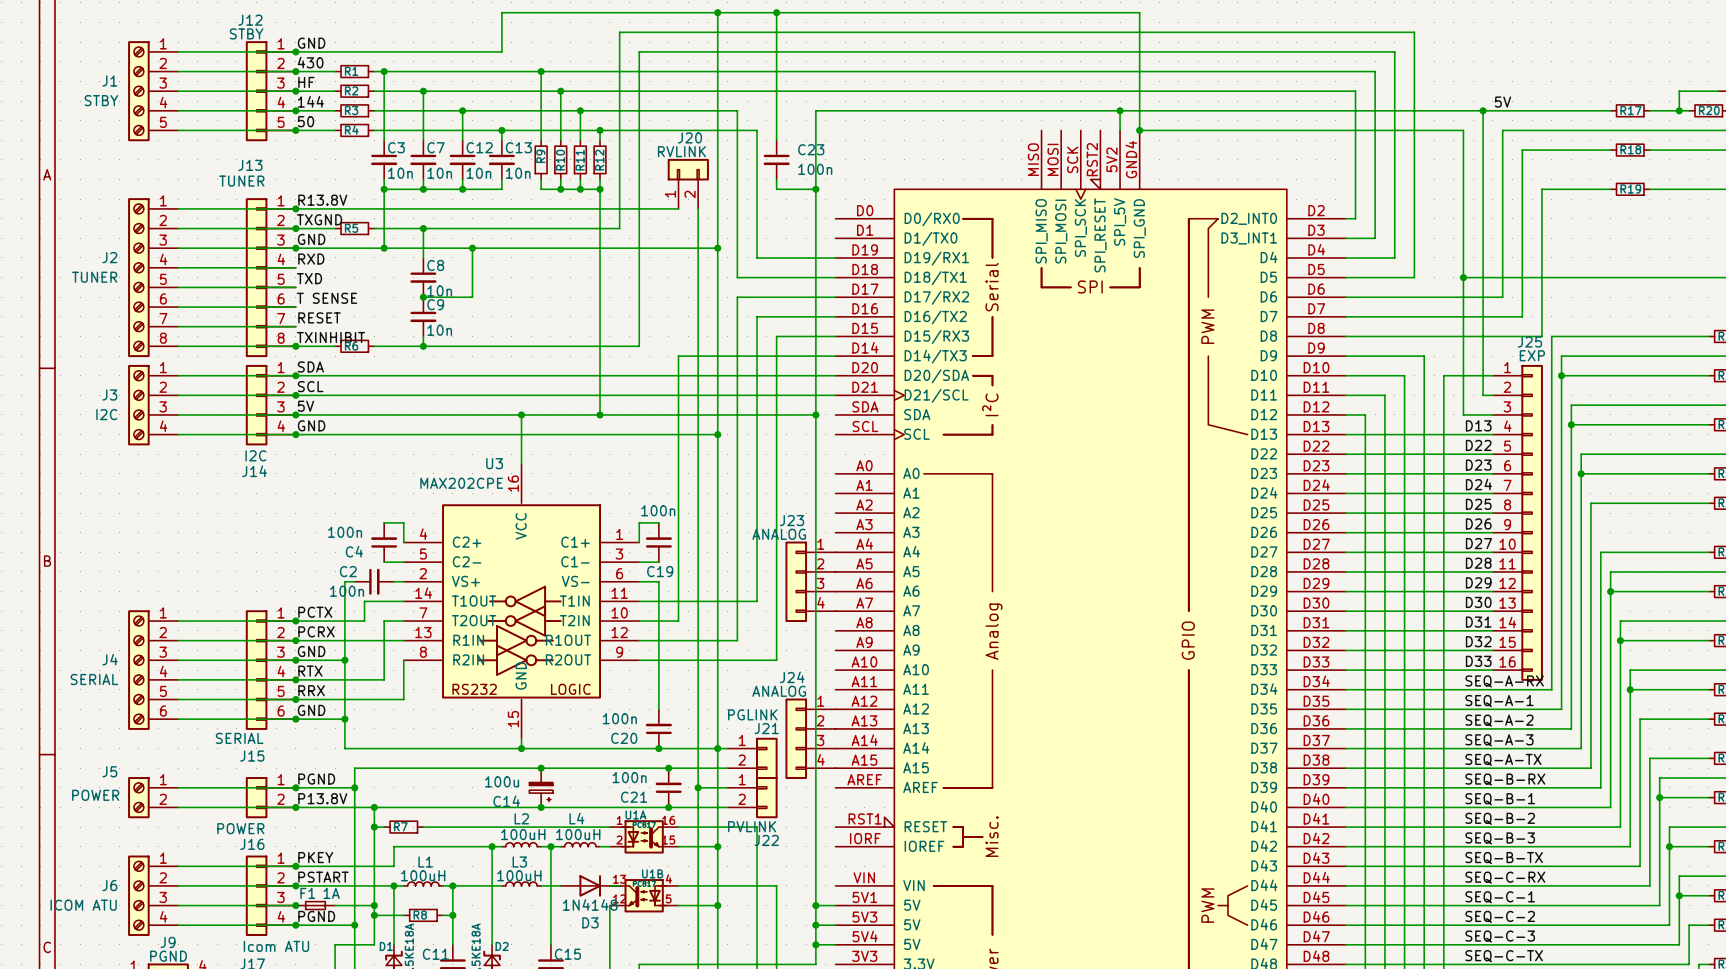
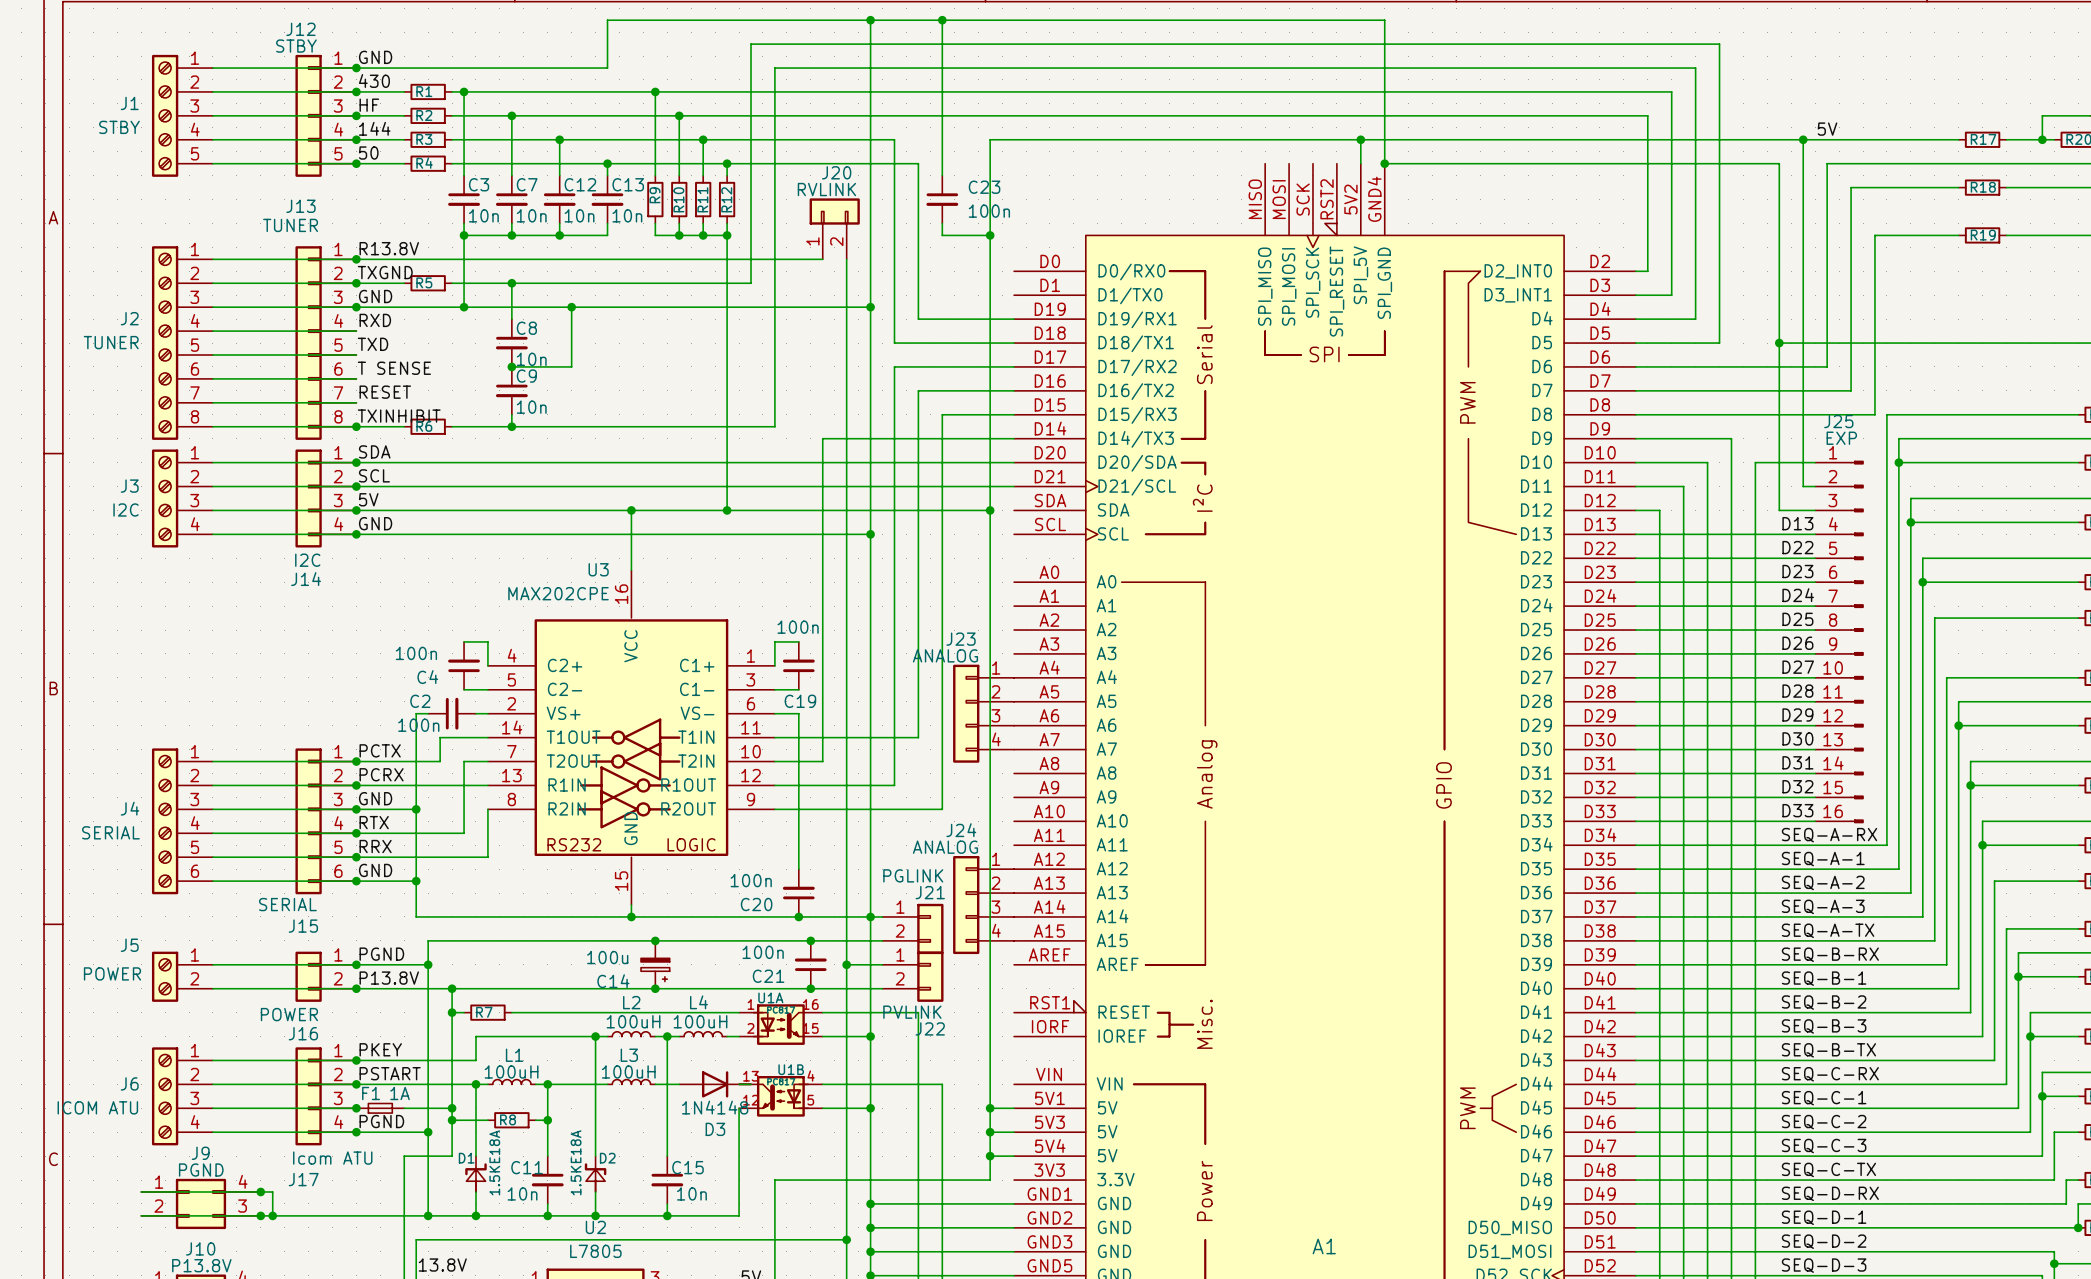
J25 symbol: [1492, 364, 1543, 681] -> [1815, 460, 1864, 824]

